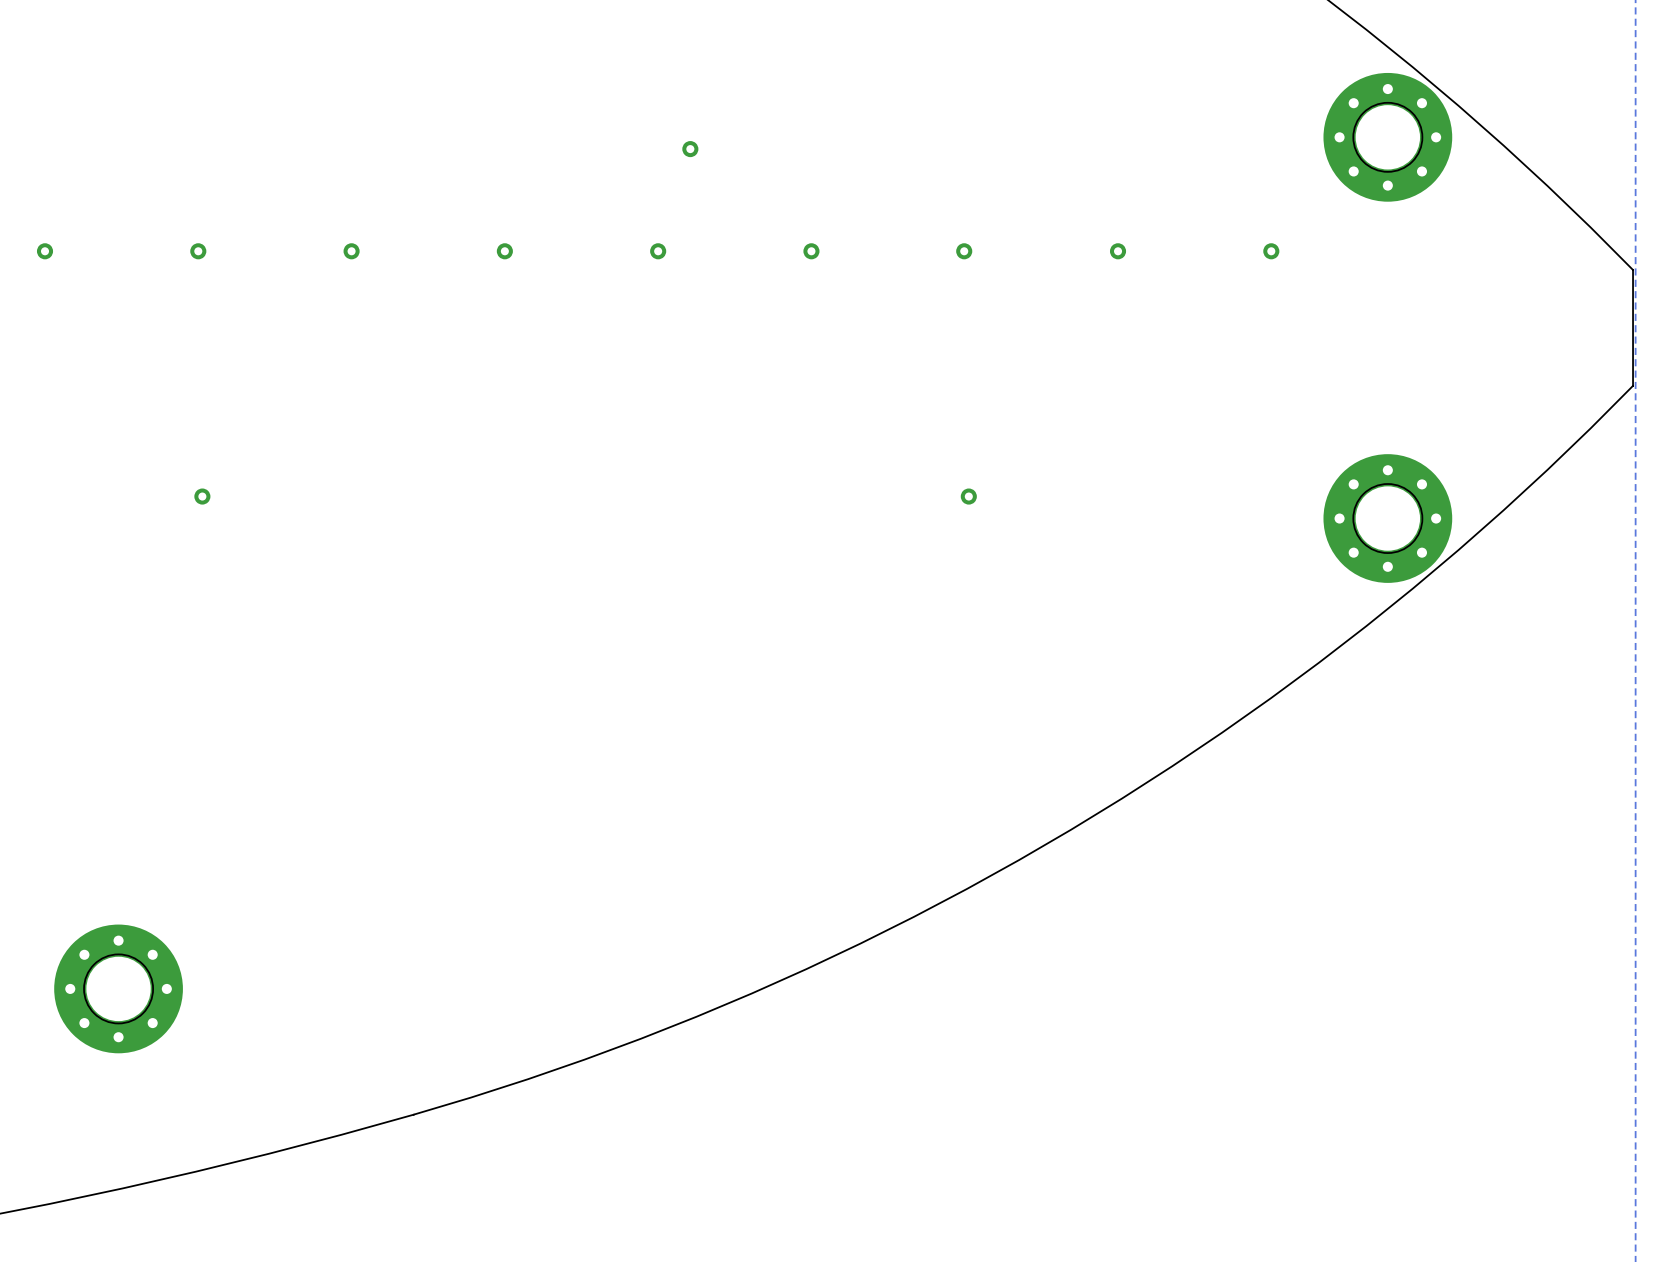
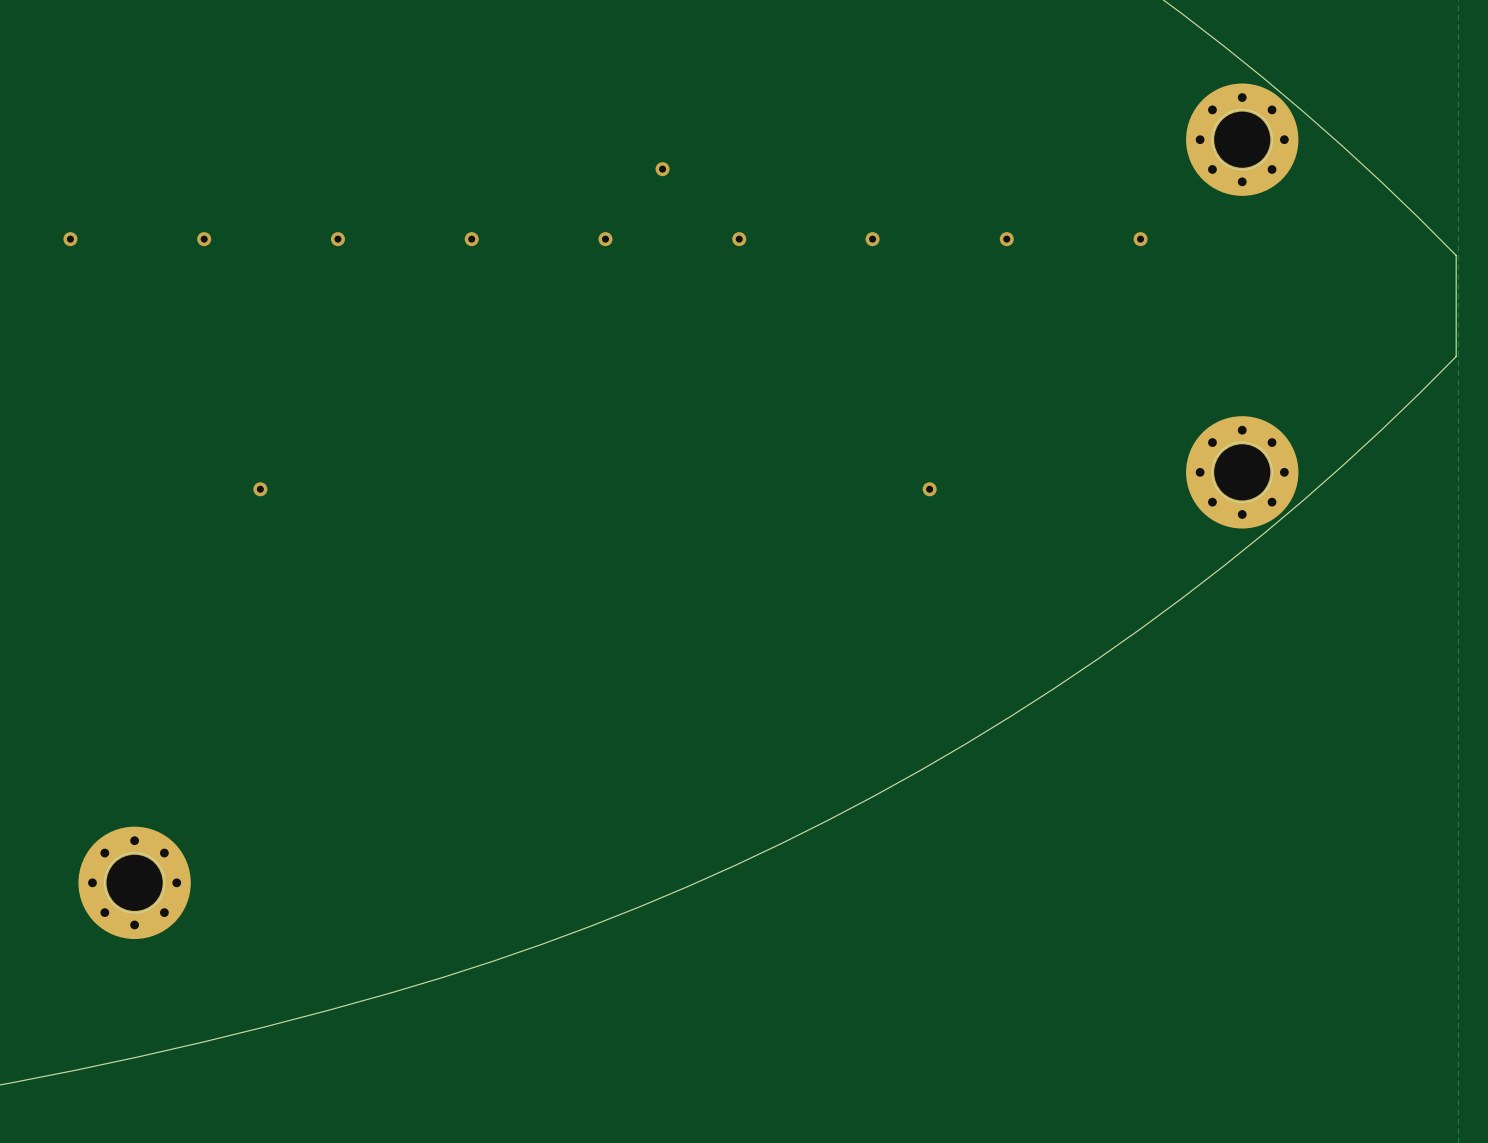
via position: (690, 149) -> (662, 169)
via position: (202, 496) -> (260, 489)
via position: (968, 496) -> (929, 489)

